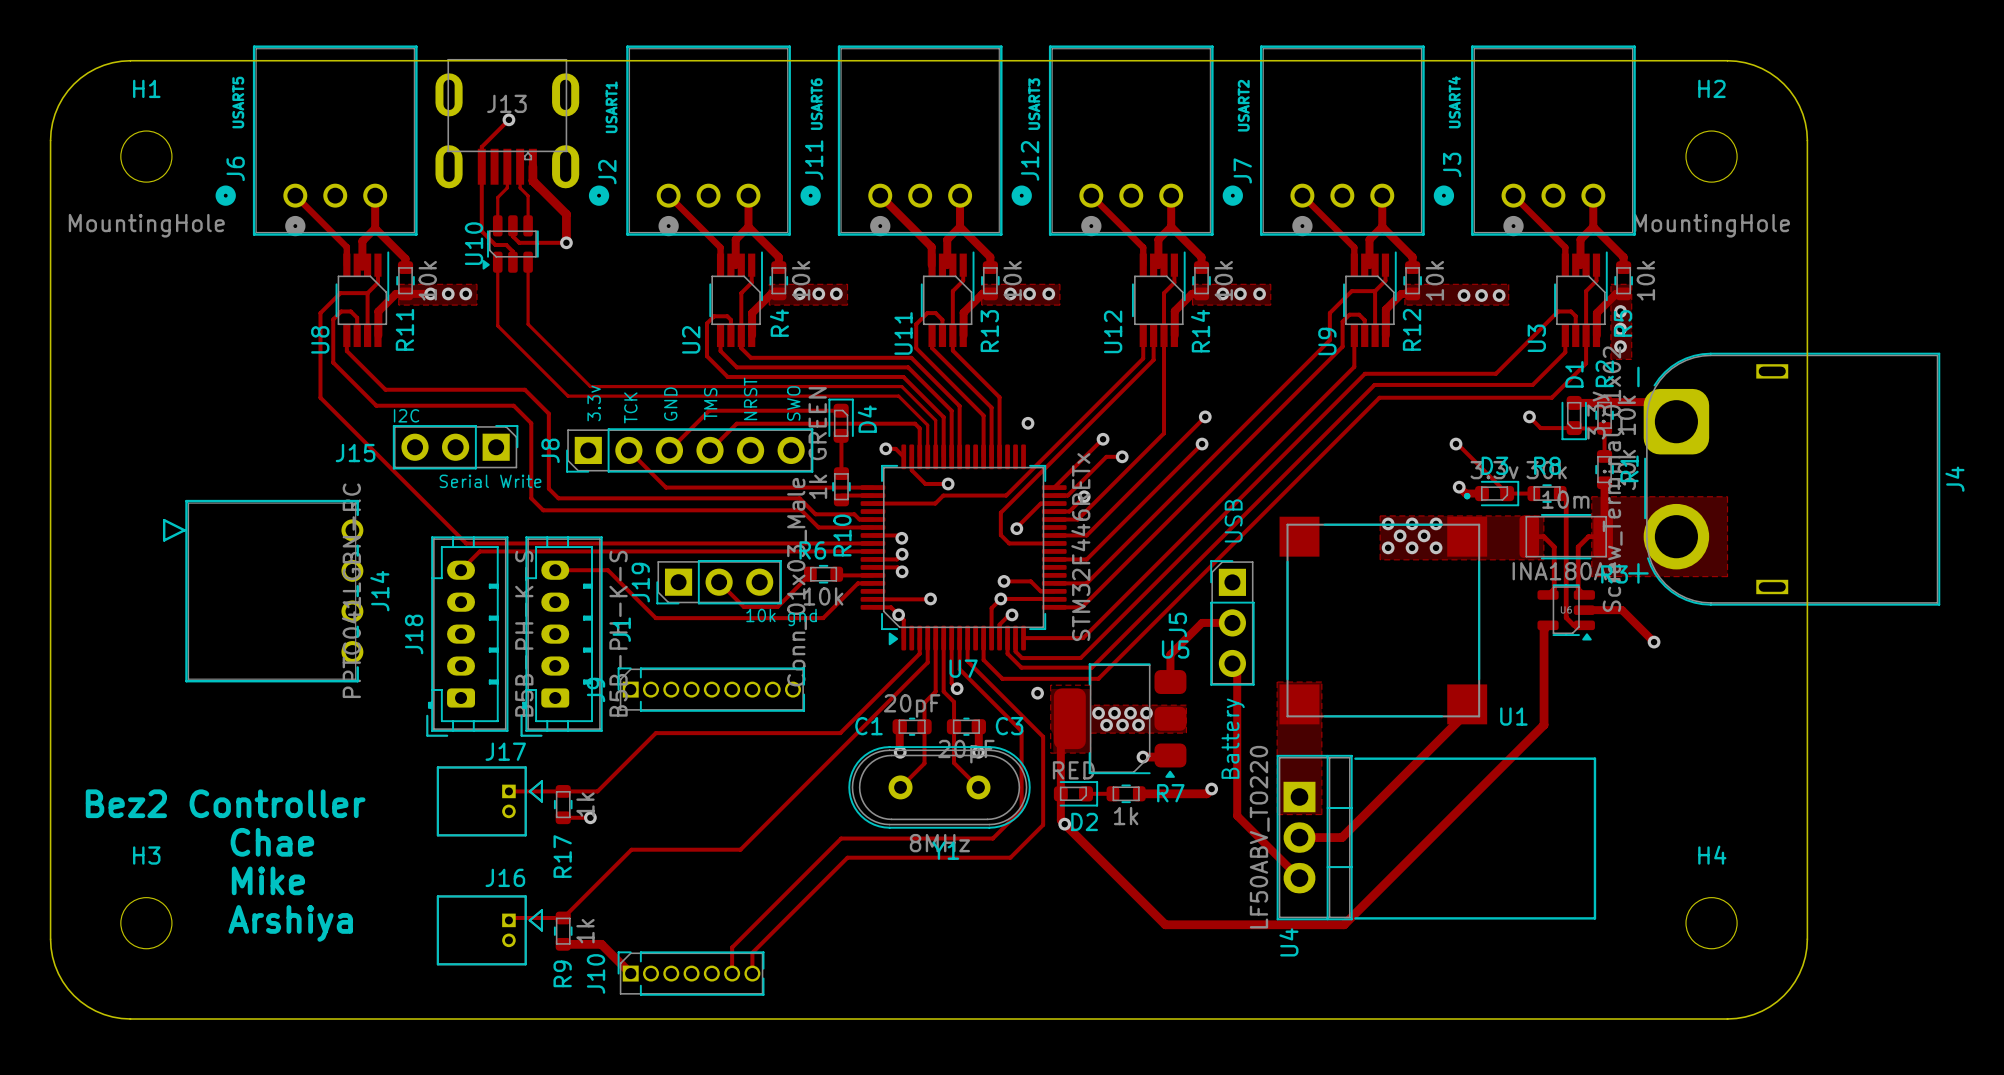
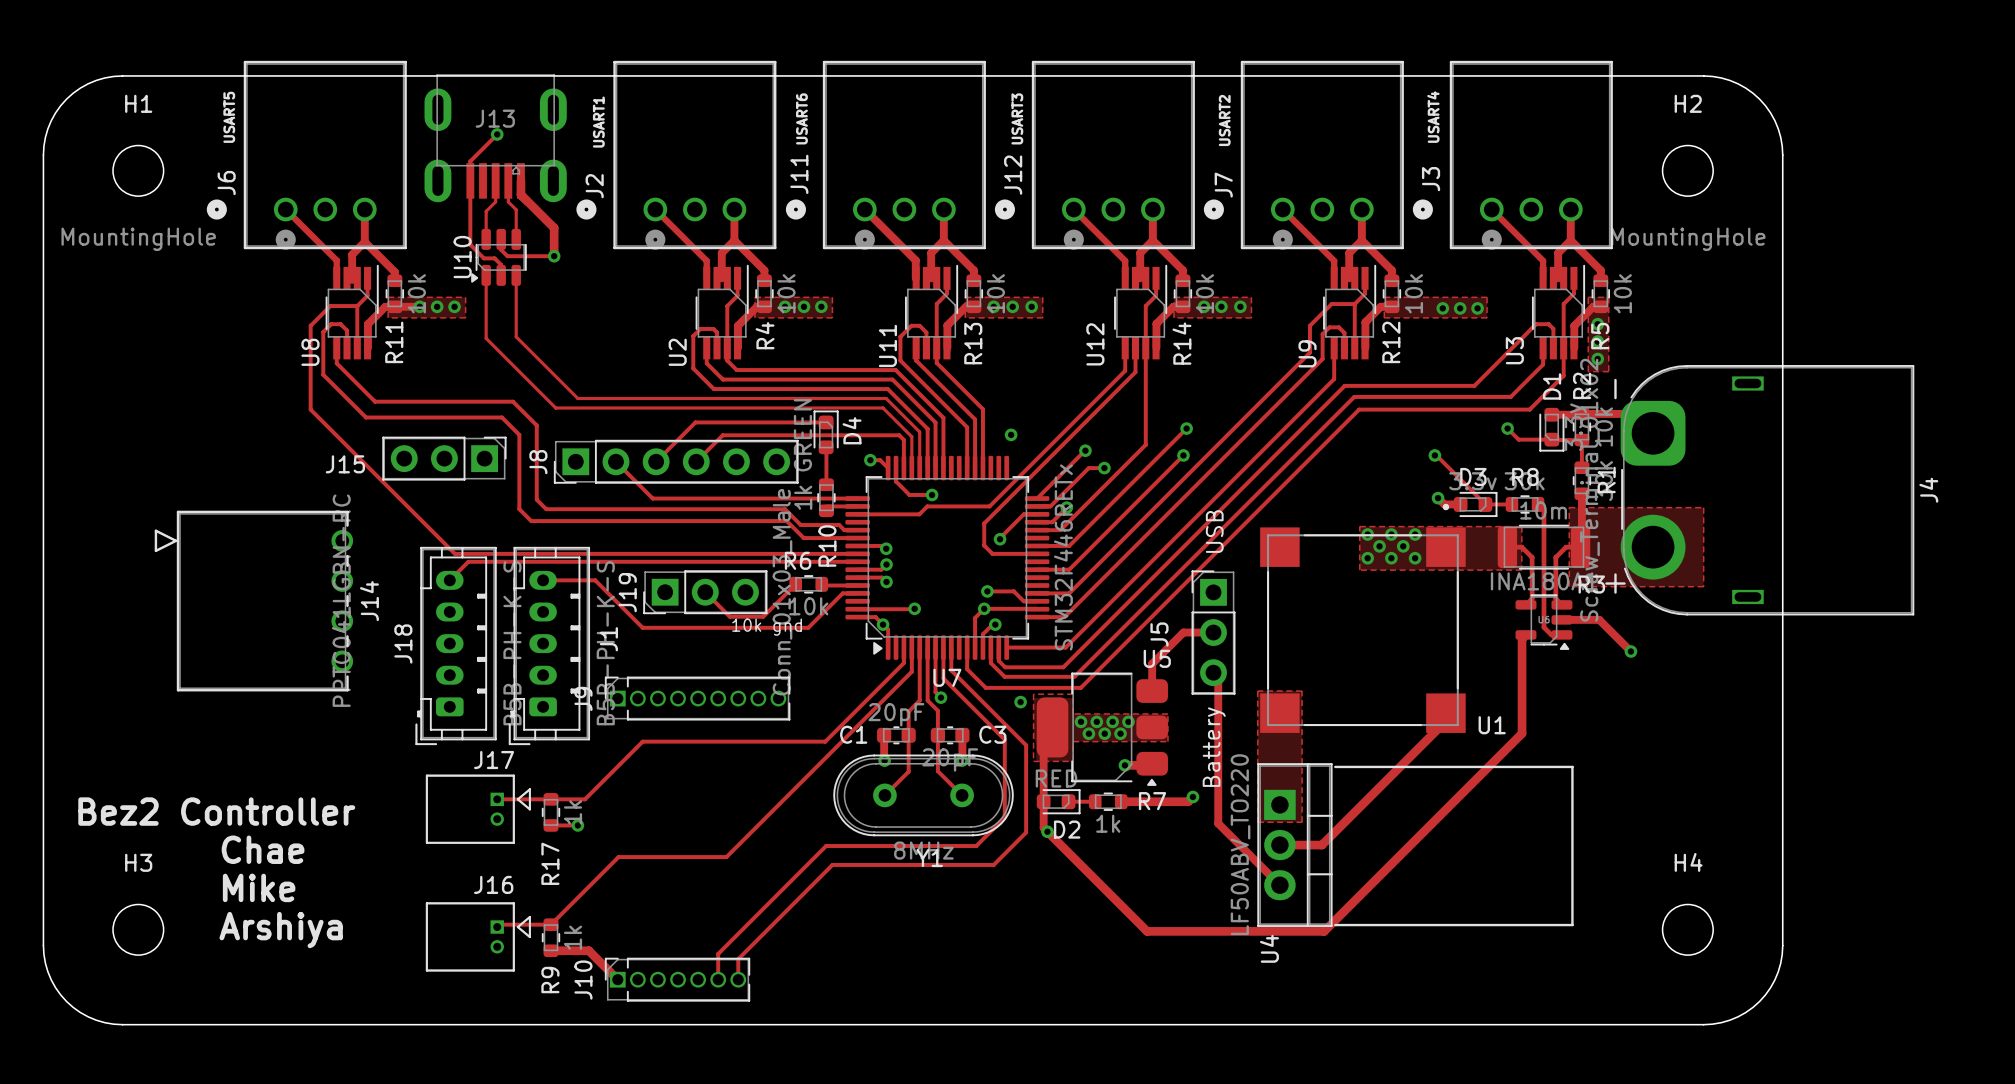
text: NRST (750, 398) -> none
text: 3.3v (594, 403) -> none
text: SWO (793, 403) -> none
text: GND (670, 404) -> none
text: TMS (710, 404) -> none
text: TCK (630, 407) -> none
text: I2C (406, 415) -> none
text: Serial Write (490, 481) -> none

